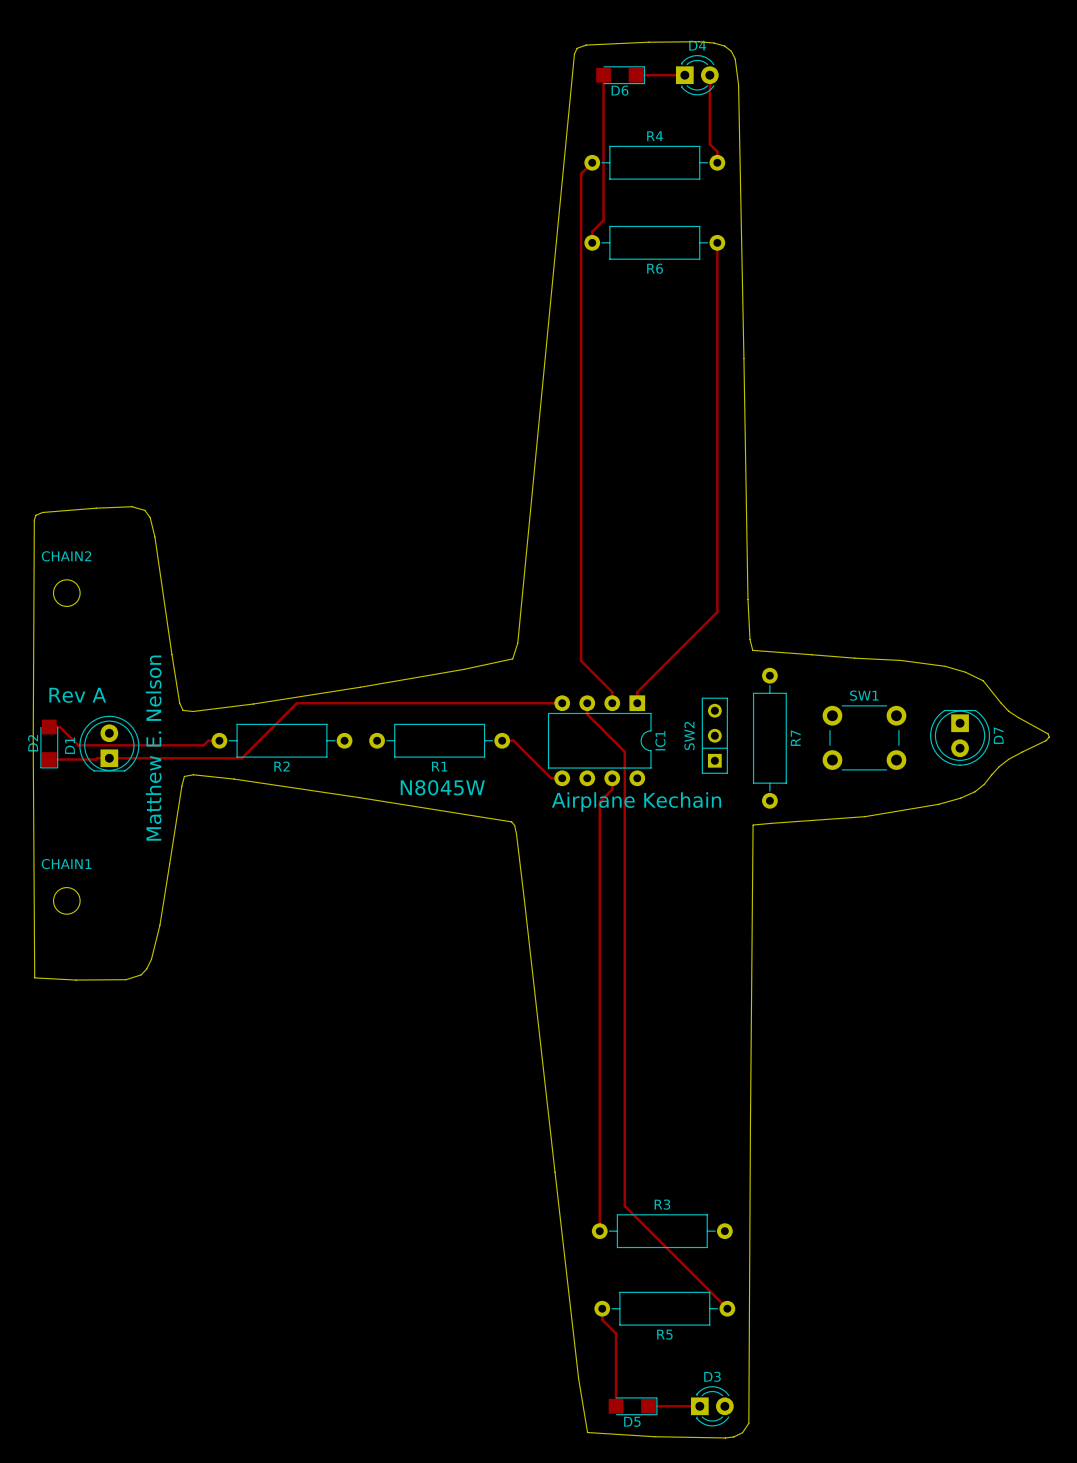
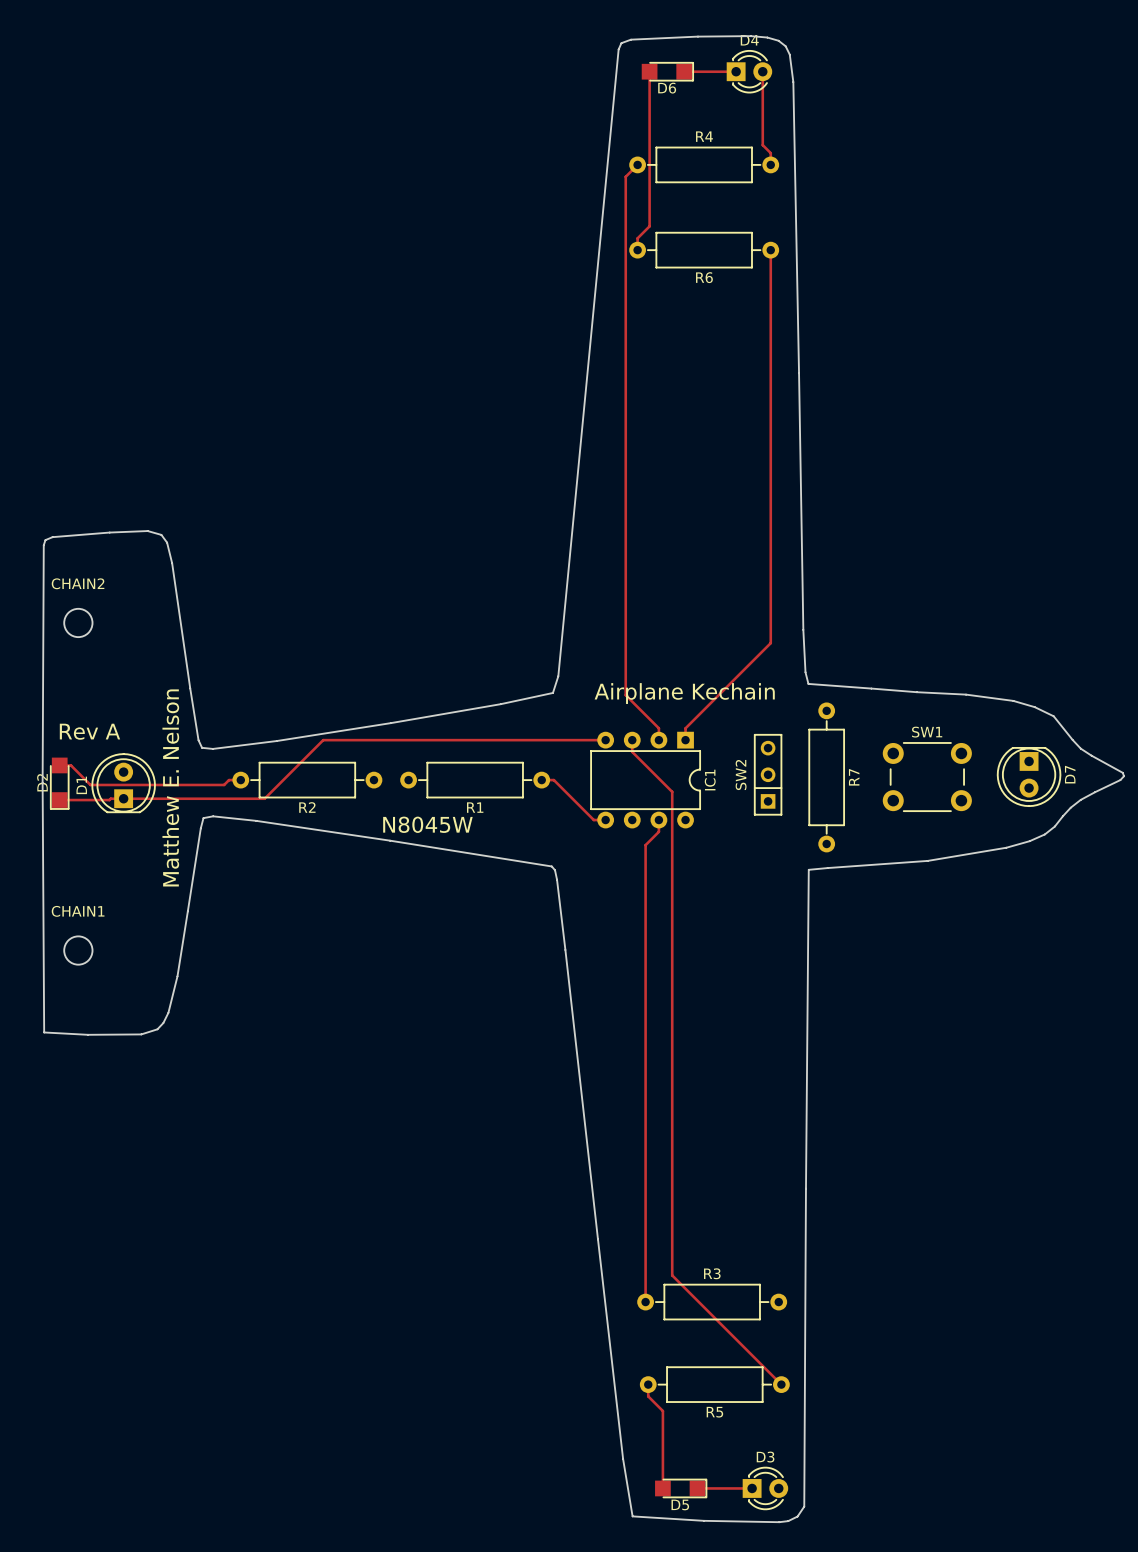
text position: N8045W (442, 787) -> N8045W (427, 824)
text position: Airplane Kechain (636, 802) -> Airplane Kechain (684, 693)

